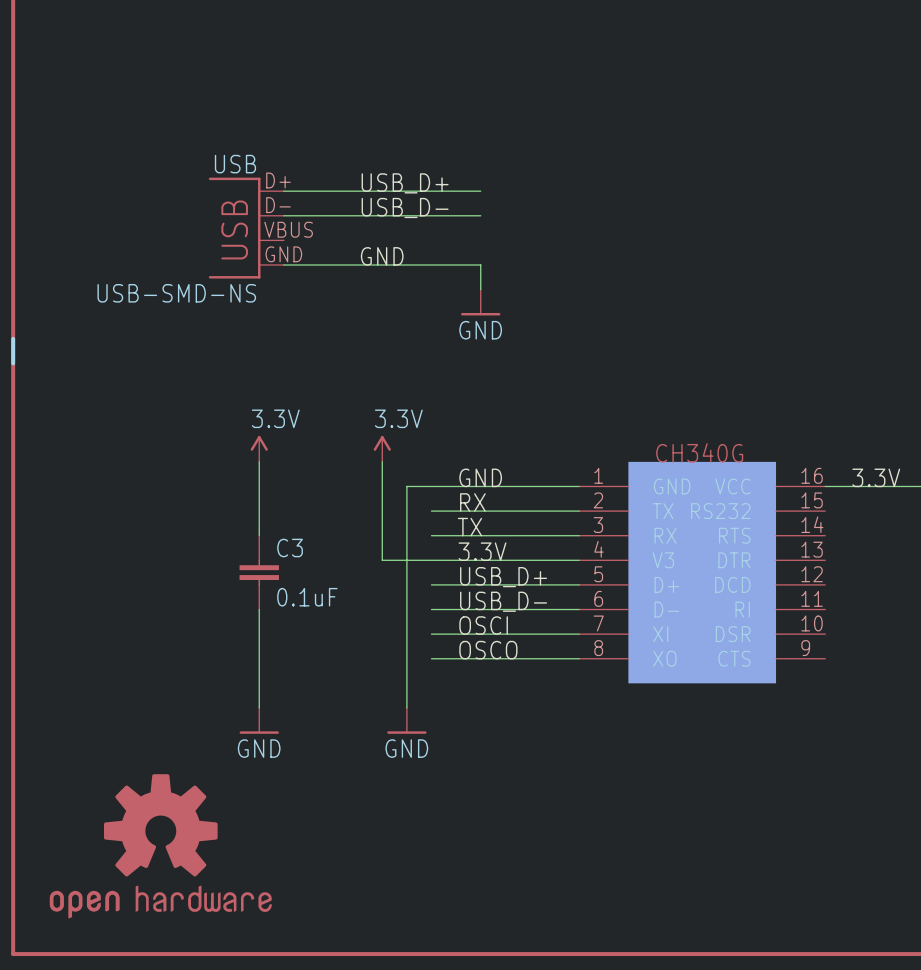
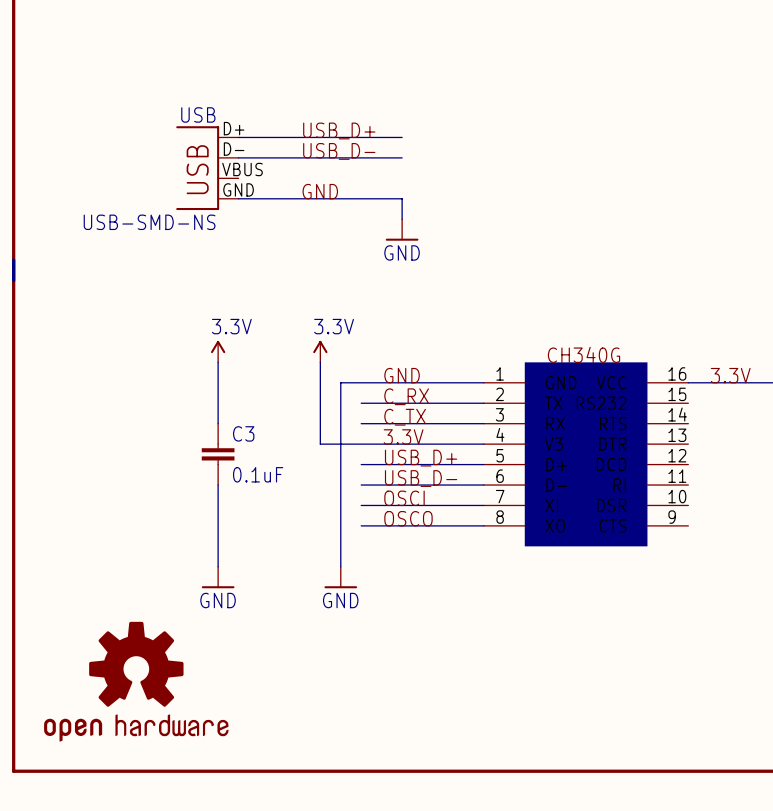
label: RX (472, 502) -> C_RX (406, 396)
label: TX (469, 527) -> C_TX (405, 417)

